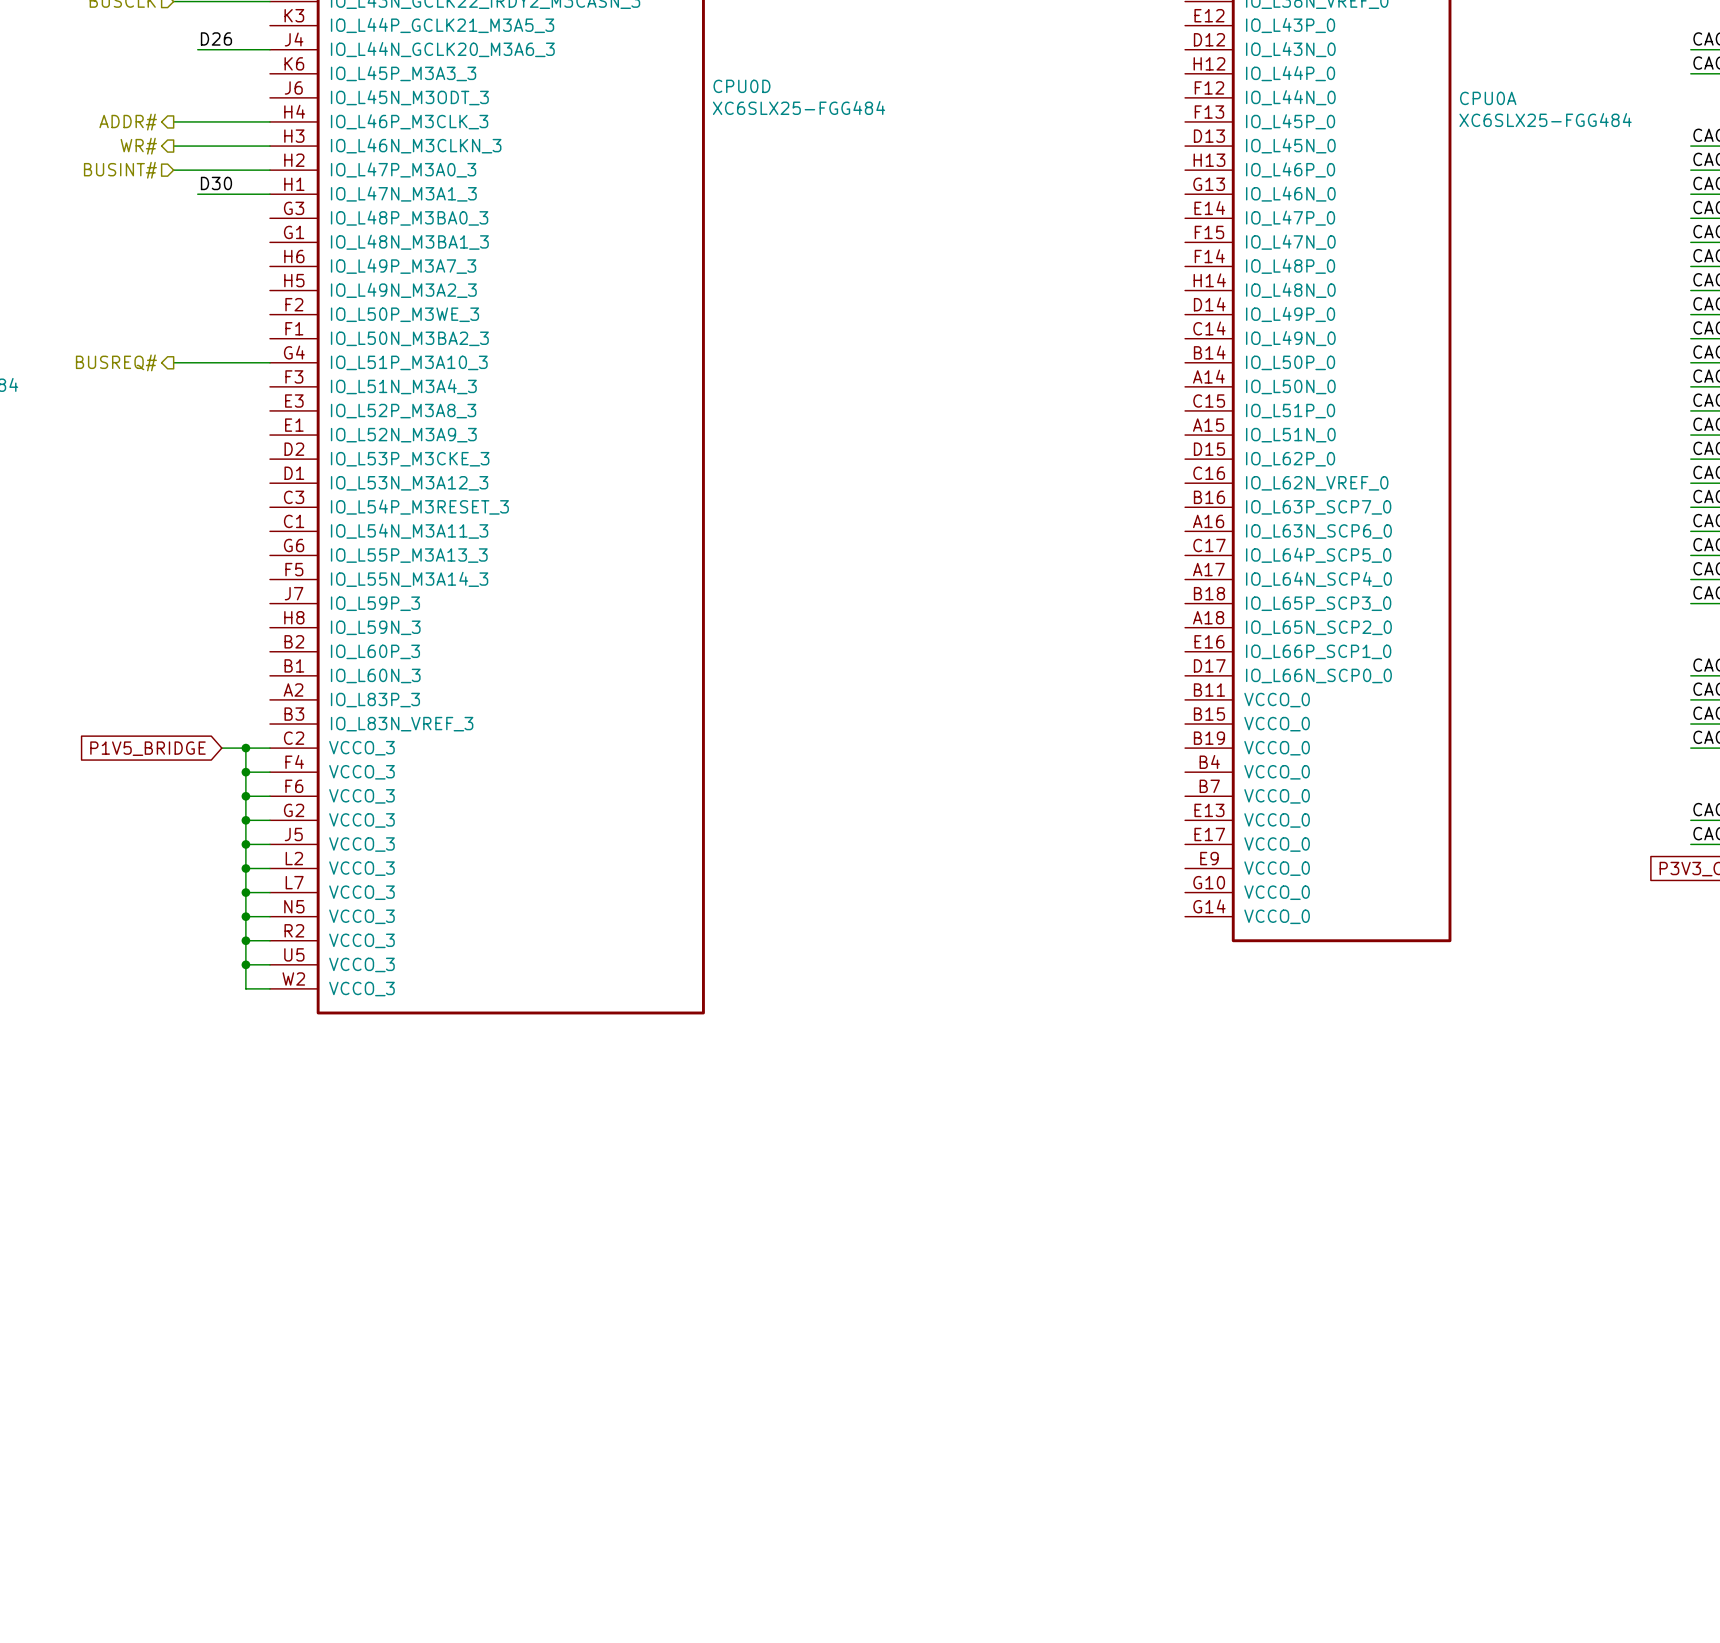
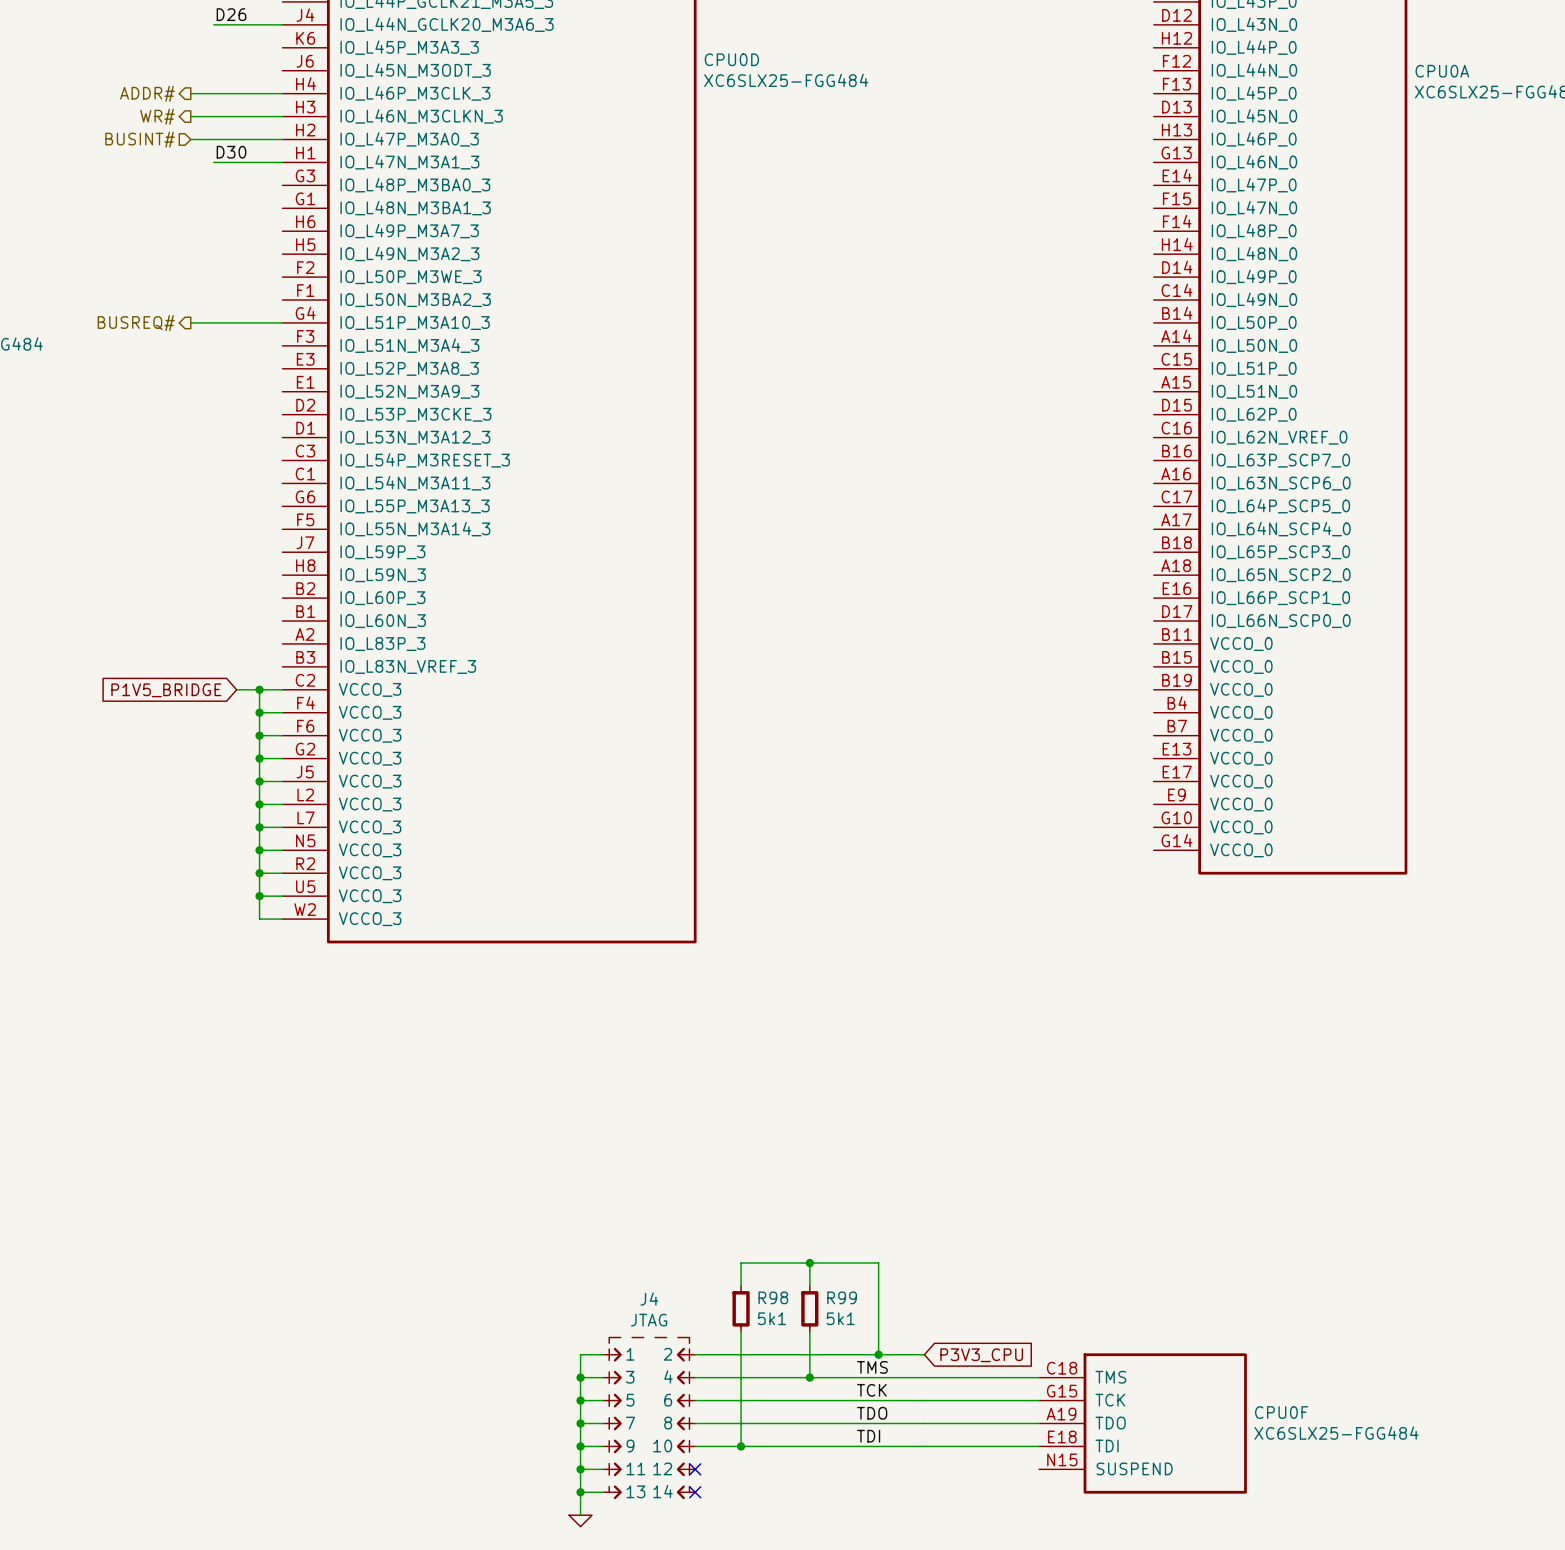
wire: none -> (809, 1263) (809, 1285)
junction: none -> (809, 1263)
wire: none -> (741, 1285) (741, 1263) (878, 1263) (878, 1354)
R98: none -> 5k1 (741, 1308)
R99: none -> 5k1 (809, 1308)
wire: none -> (741, 1331) (741, 1446)
wire: none -> (809, 1331) (809, 1377)
wire: none -> (603, 1354) (580, 1354) (580, 1515)
wire: none -> (695, 1354) (924, 1354)
junction: none -> (878, 1354)
global label: none -> P3V3_CPU (981, 1355)
label: none -> TMS (872, 1367)
wire: none -> (580, 1377) (603, 1377)
junction: none -> (580, 1377)
wire: none -> (695, 1377) (1039, 1377)
junction: none -> (809, 1377)
label: none -> TCK (871, 1390)
wire: none -> (580, 1400) (603, 1400)
junction: none -> (580, 1400)
wire: none -> (695, 1400) (1039, 1400)
label: none -> TDO (872, 1413)
J4: none -> JTAG (649, 1418)
wire: none -> (580, 1423) (603, 1423)
junction: none -> (580, 1423)
wire: none -> (695, 1423) (1039, 1423)
CPU0F: none -> XC6SLX25-FGG484 (1142, 1423)
label: none -> TDI (868, 1436)
wire: none -> (580, 1446) (603, 1446)
junction: none -> (580, 1446)
wire: none -> (695, 1446) (1039, 1446)
junction: none -> (741, 1446)
wire: none -> (580, 1469) (603, 1469)
junction: none -> (580, 1469)
no-connect mark: none -> (695, 1469)
wire: none -> (580, 1492) (603, 1492)
junction: none -> (580, 1492)
no-connect mark: none -> (695, 1492)
power symbol: none -> (580, 1520)

